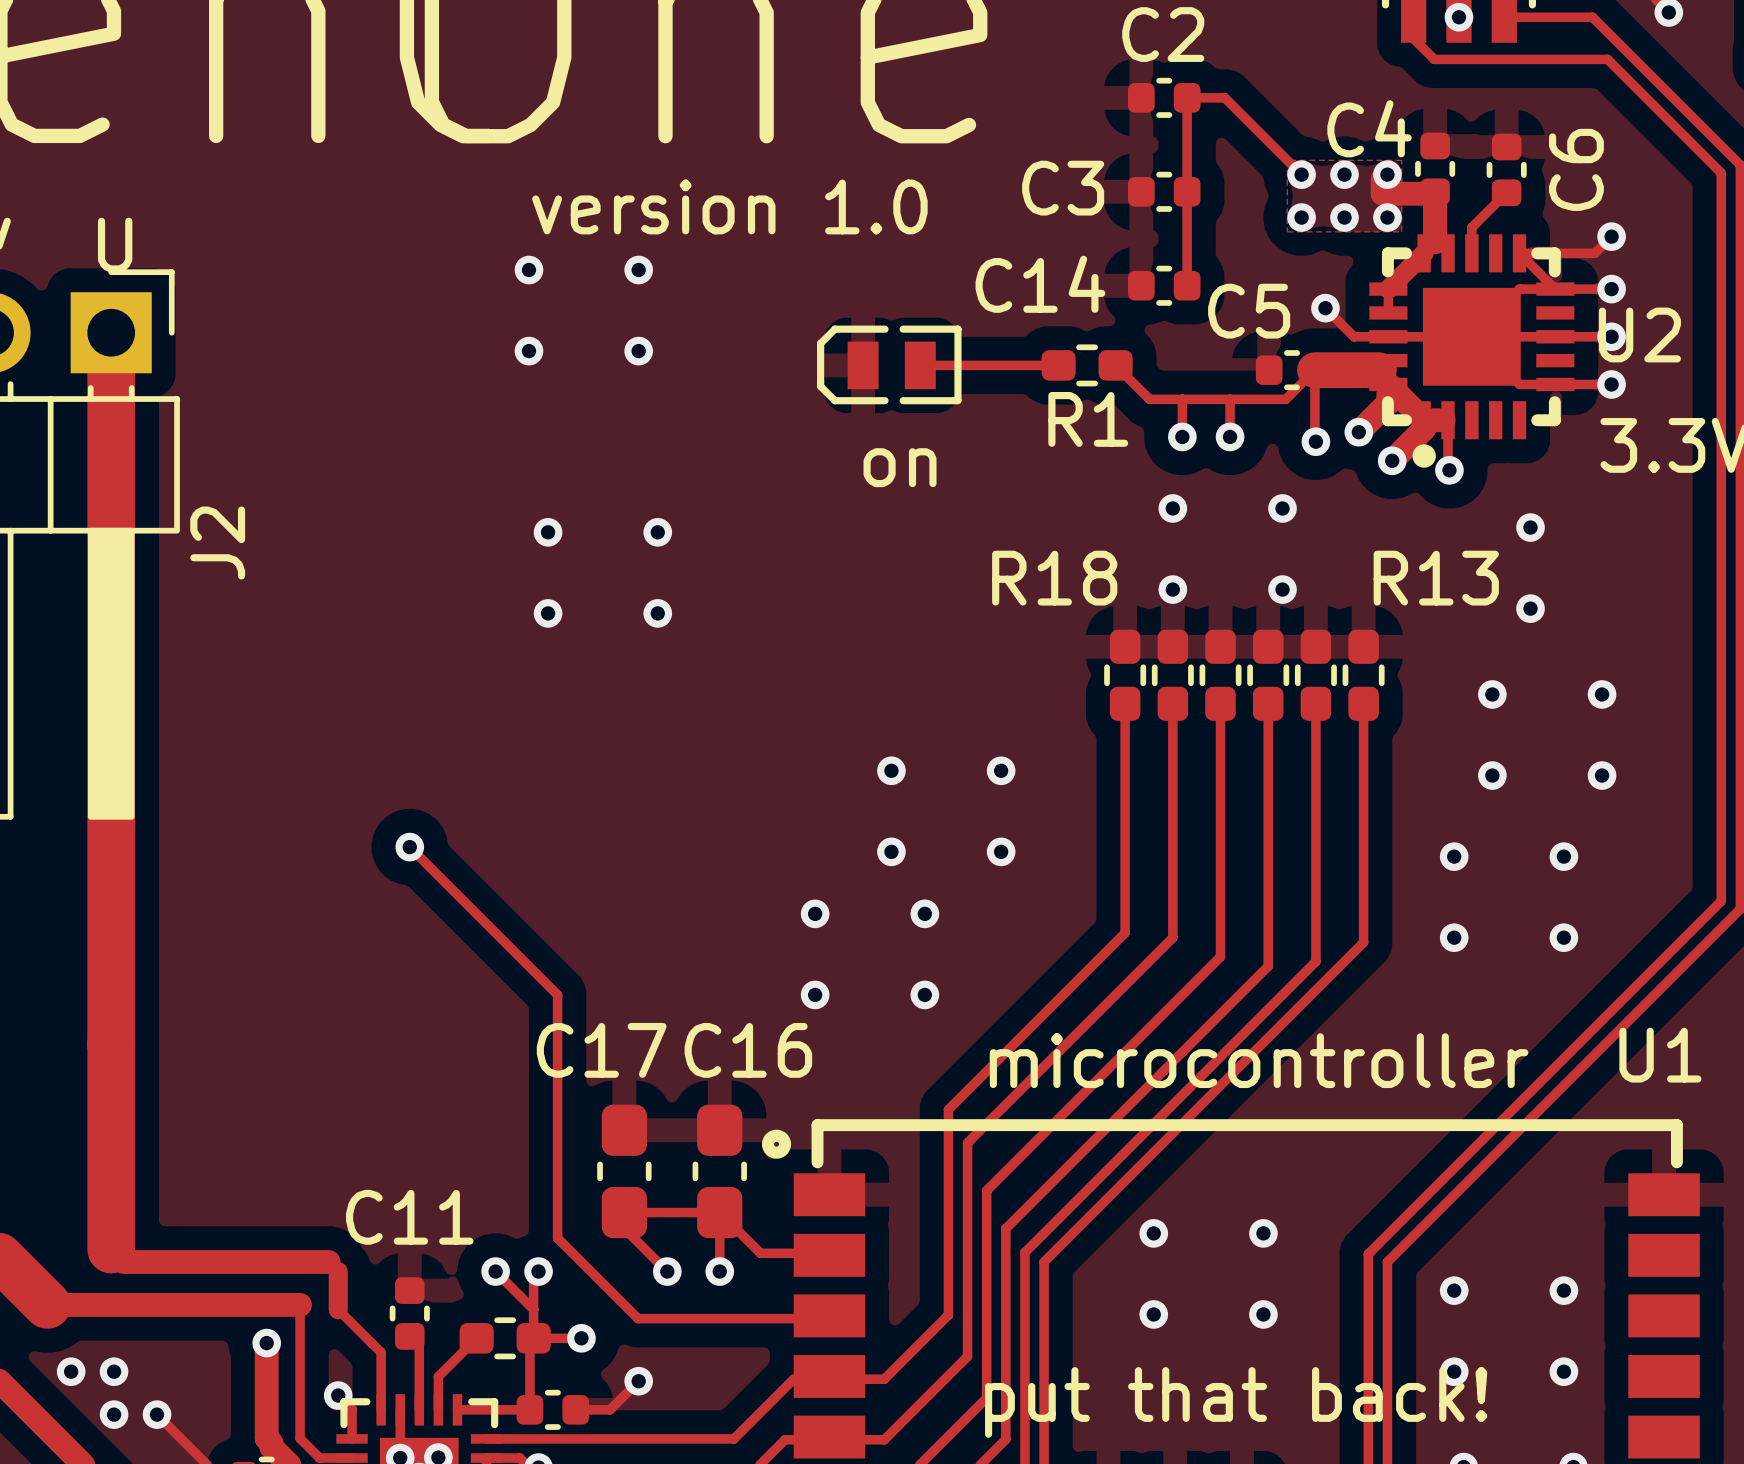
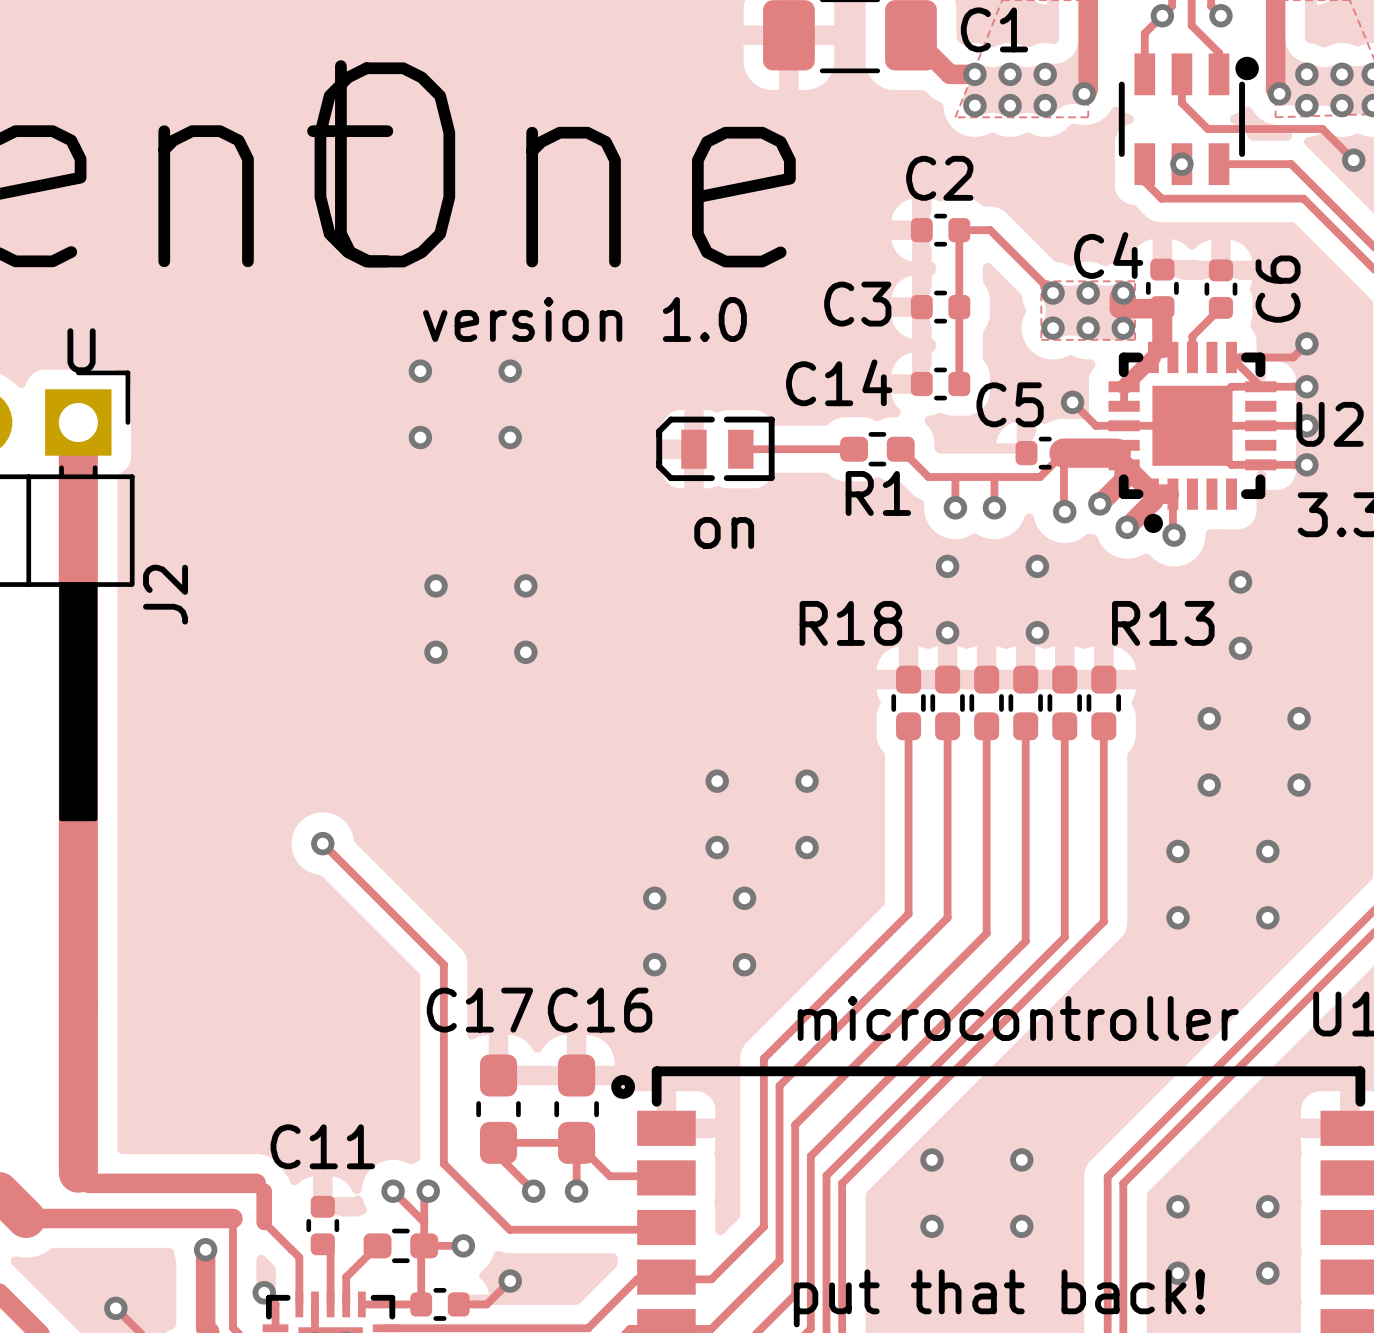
via: (71, 1371) -> none
via: (114, 1371) -> none
via: (114, 1414) -> none

